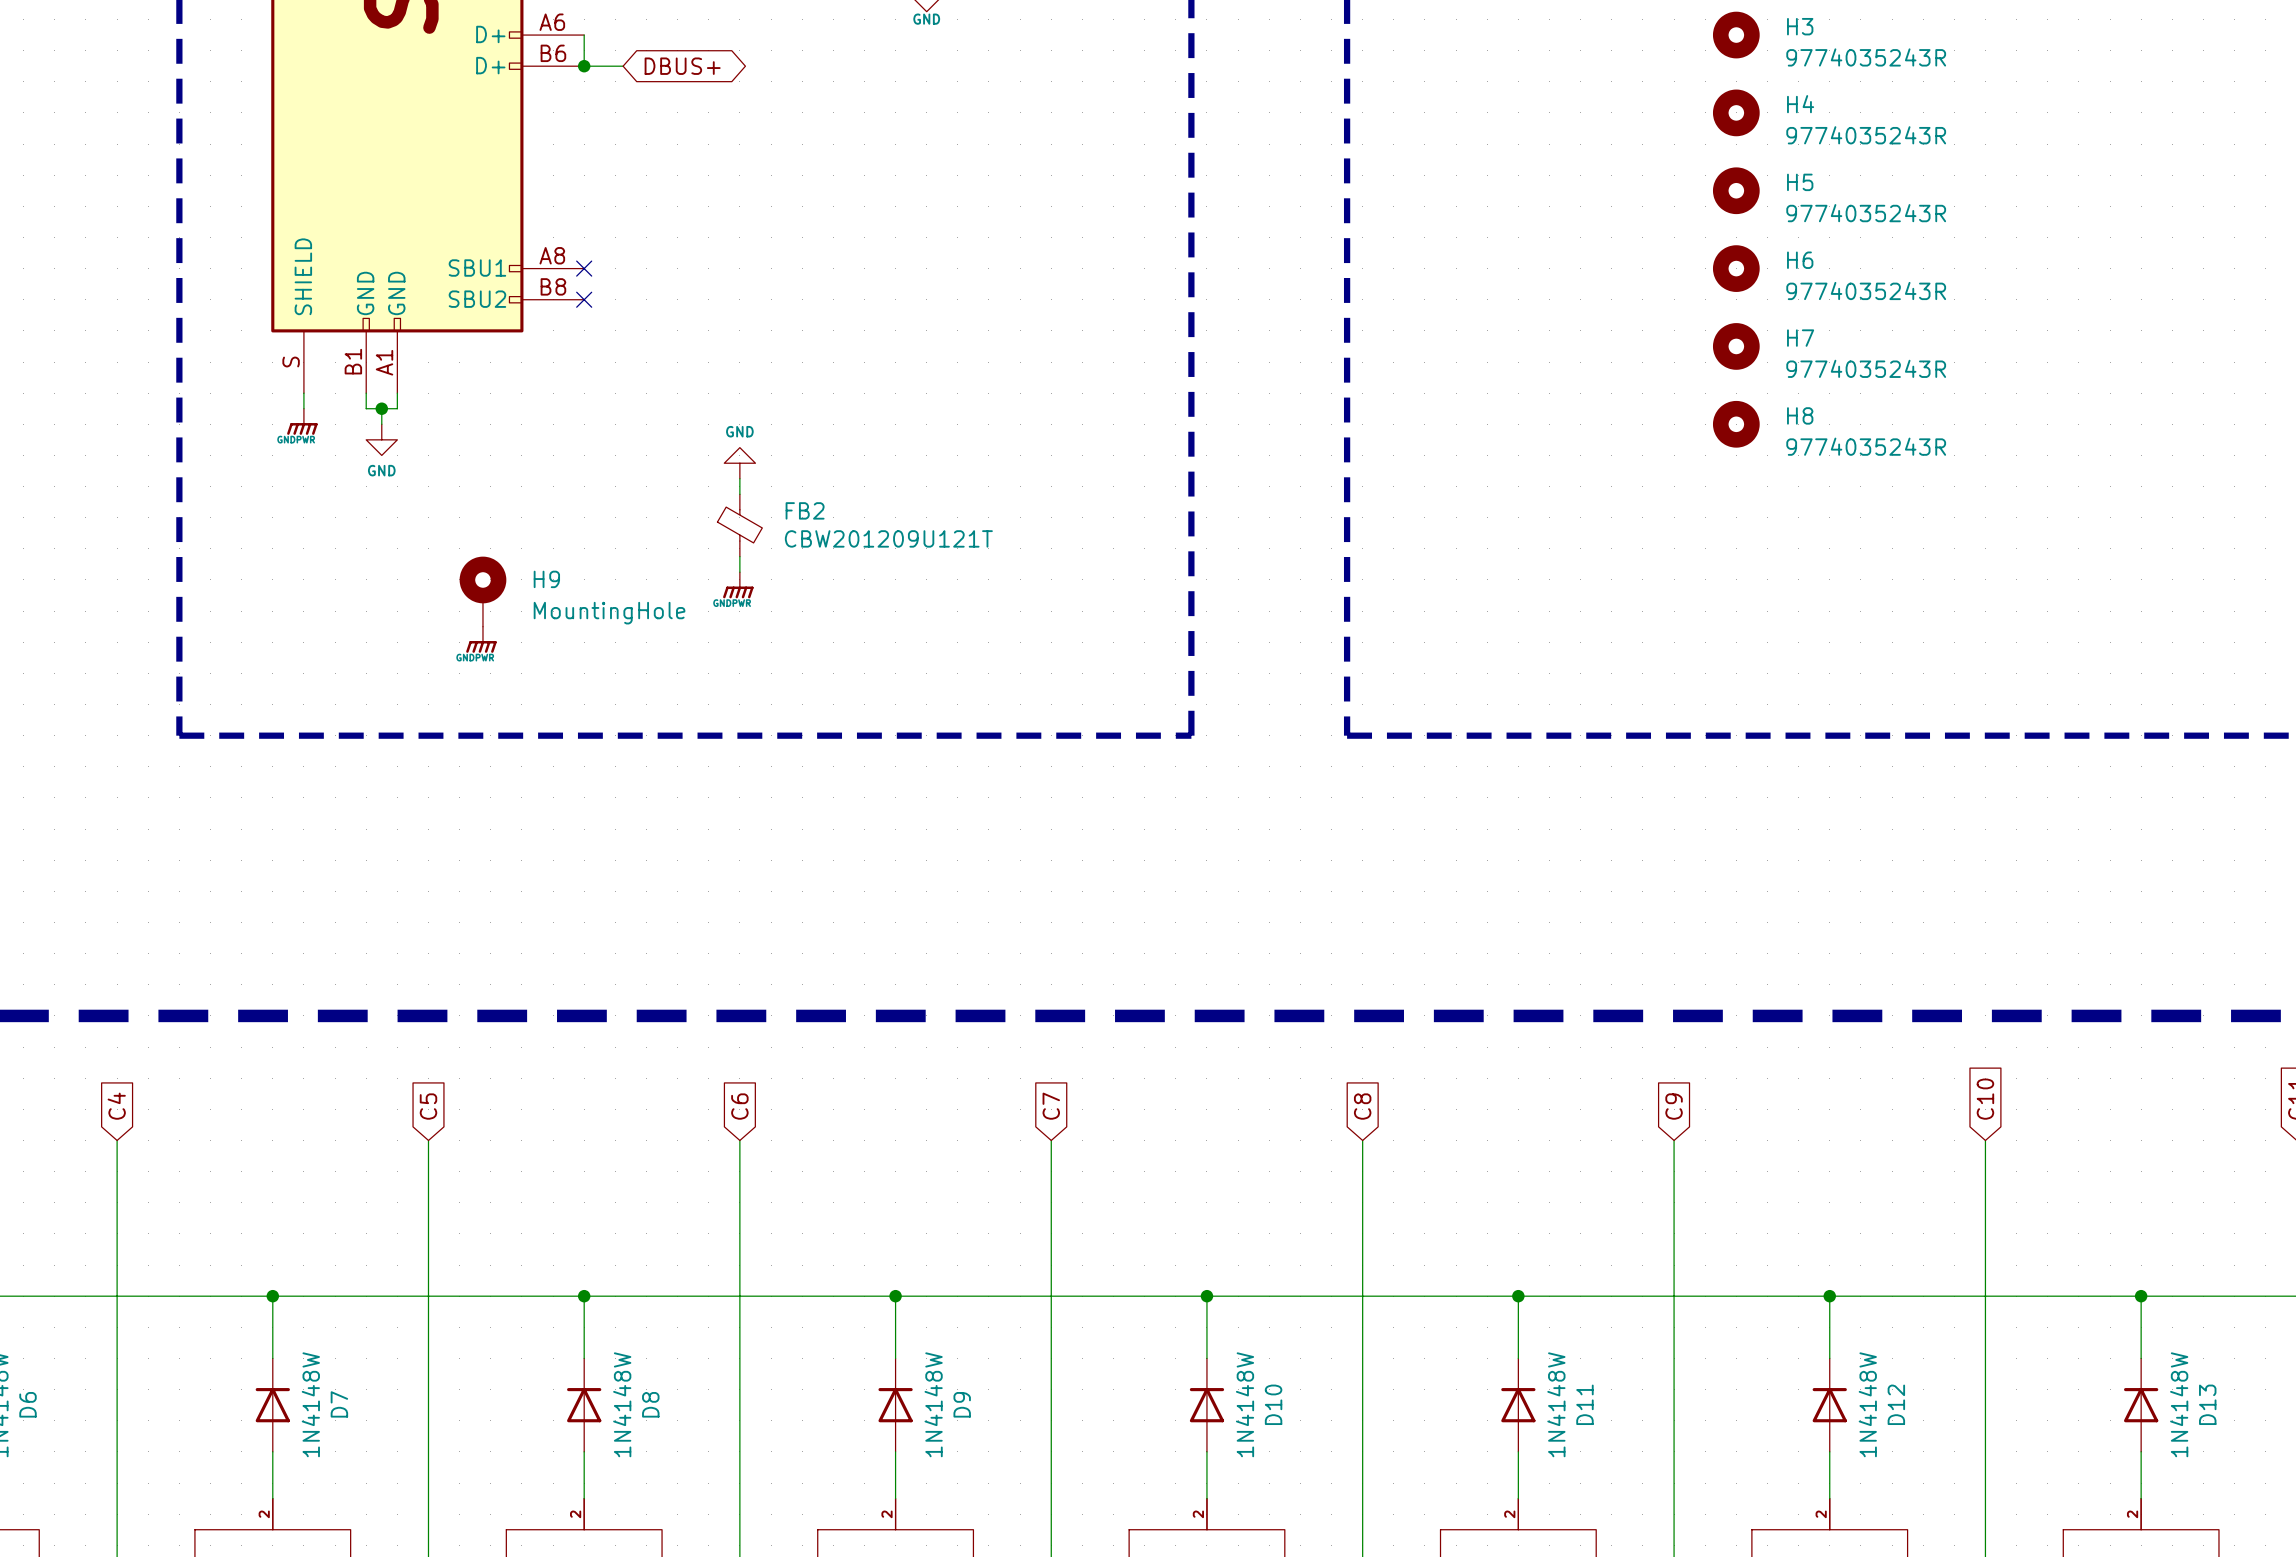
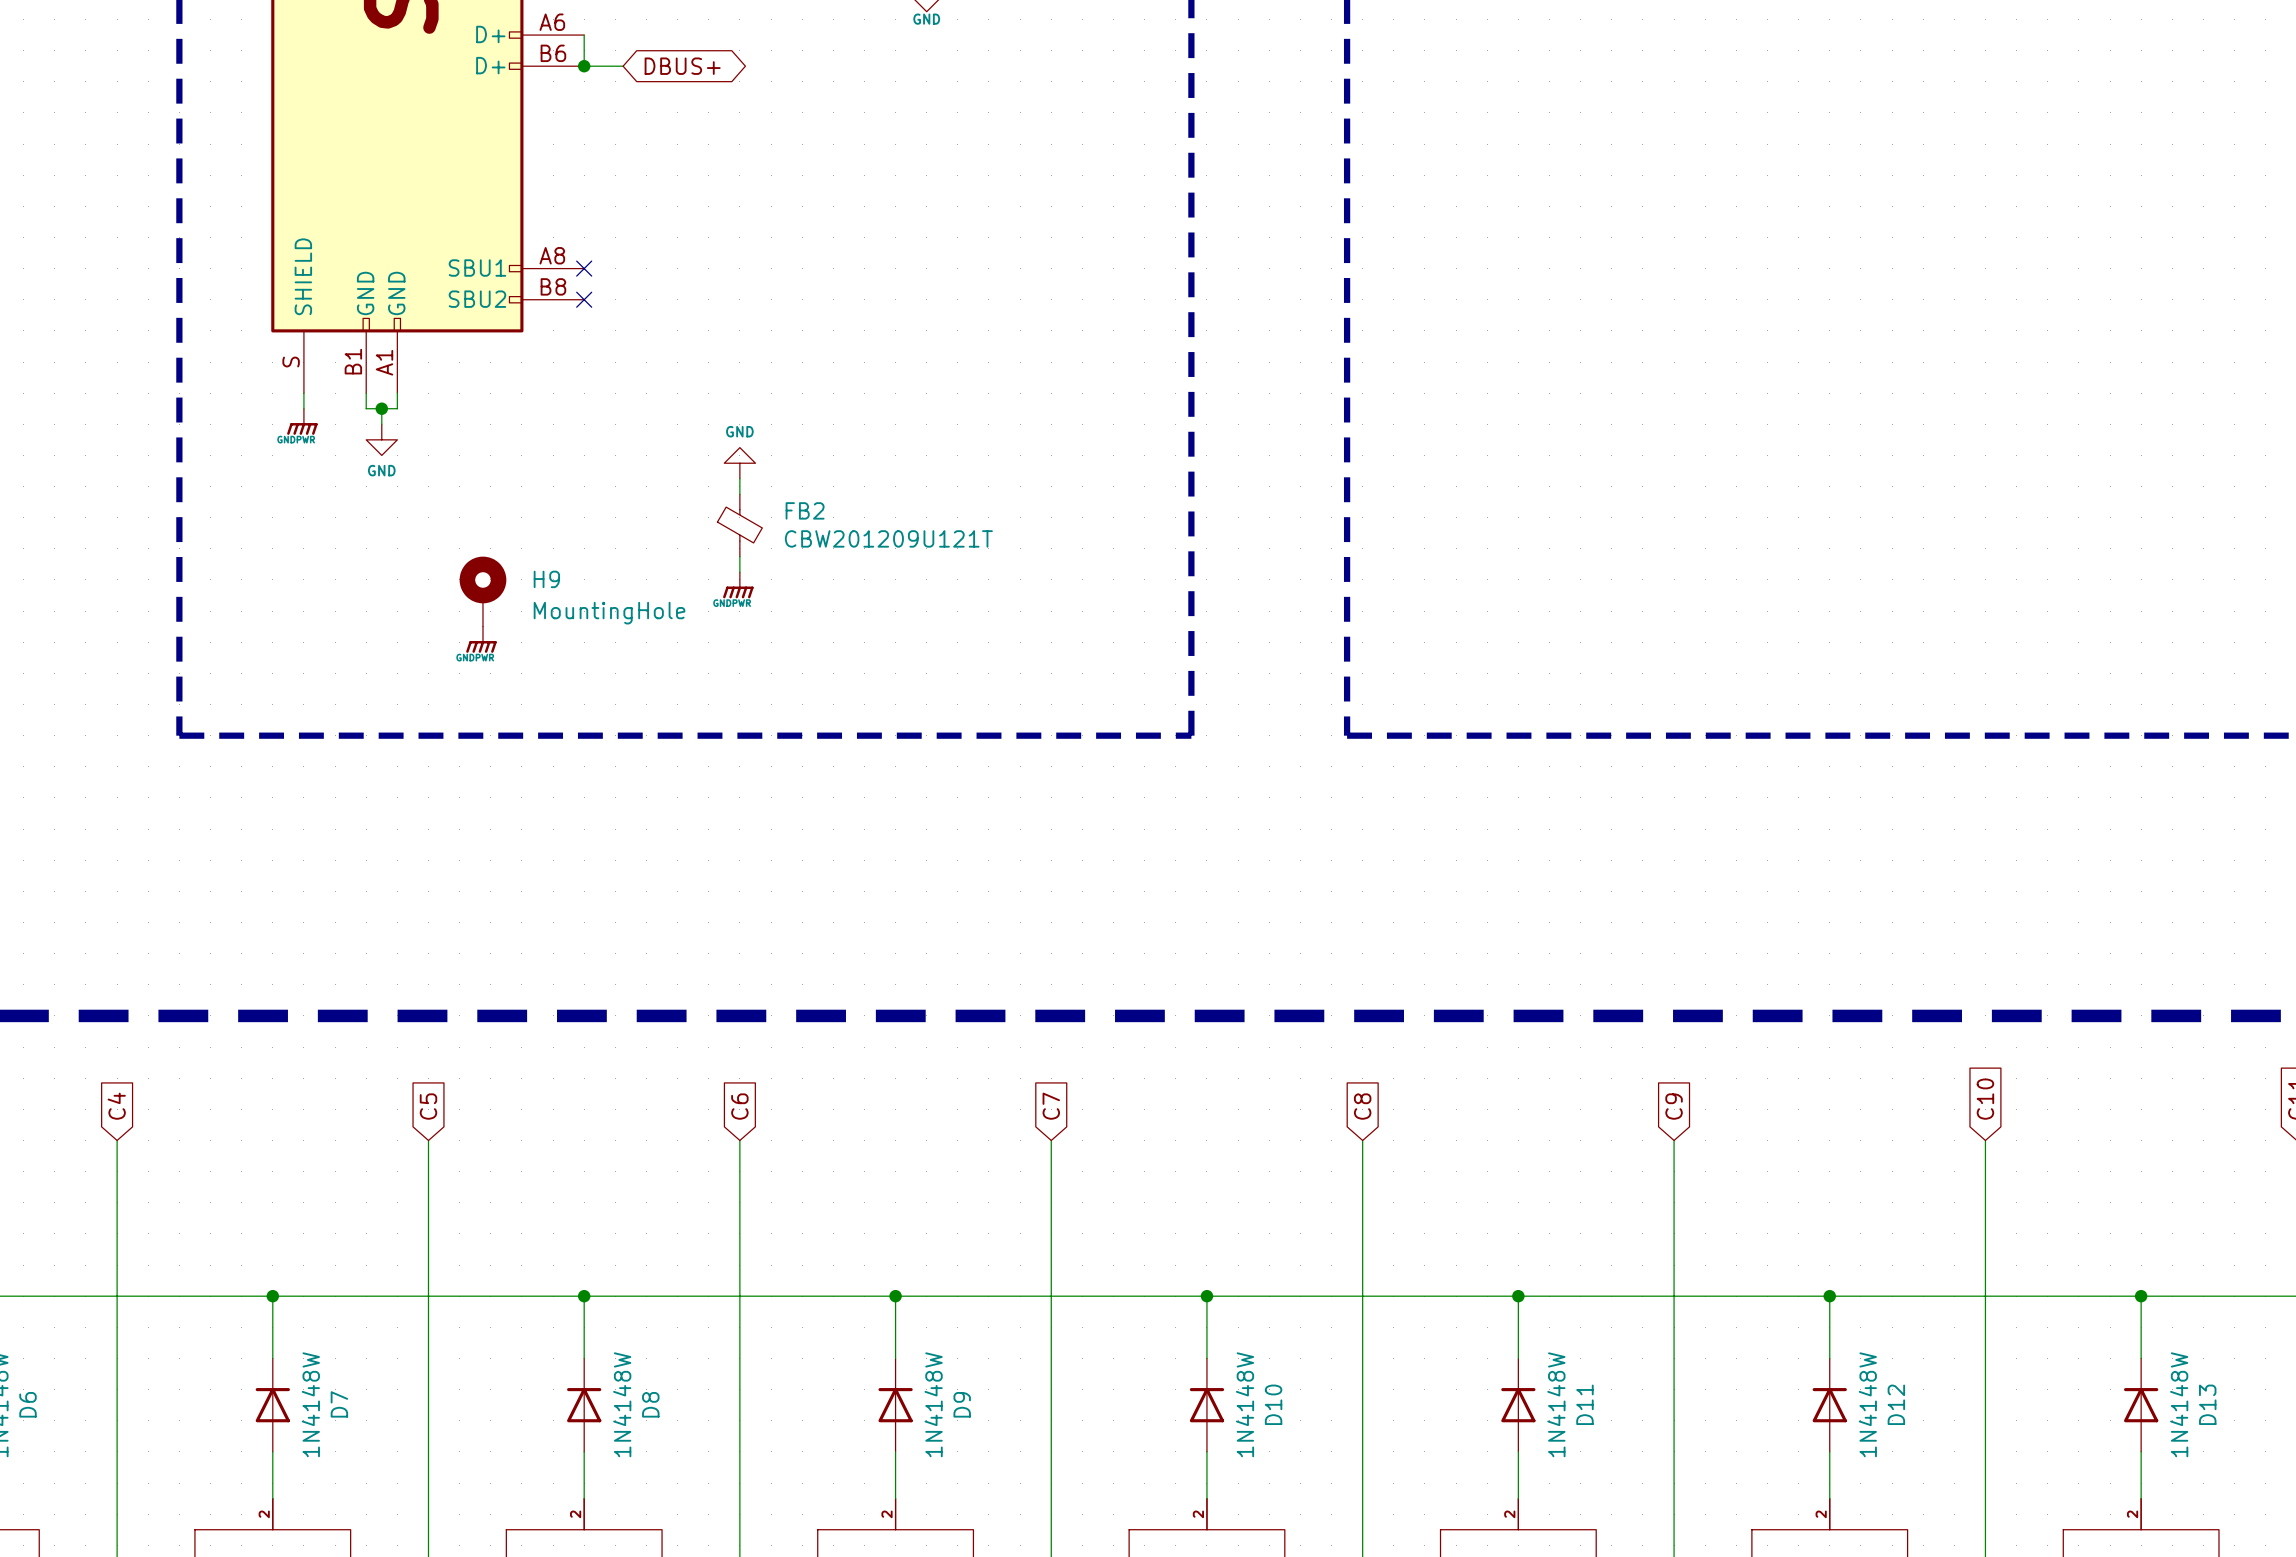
H3: 9774035243R (1736, 35) -> none
H4: 9774035243R (1736, 112) -> none
H5: 9774035243R (1736, 190) -> none
H6: 9774035243R (1736, 268) -> none
H7: 9774035243R (1736, 346) -> none
H8: 9774035243R (1736, 424) -> none

